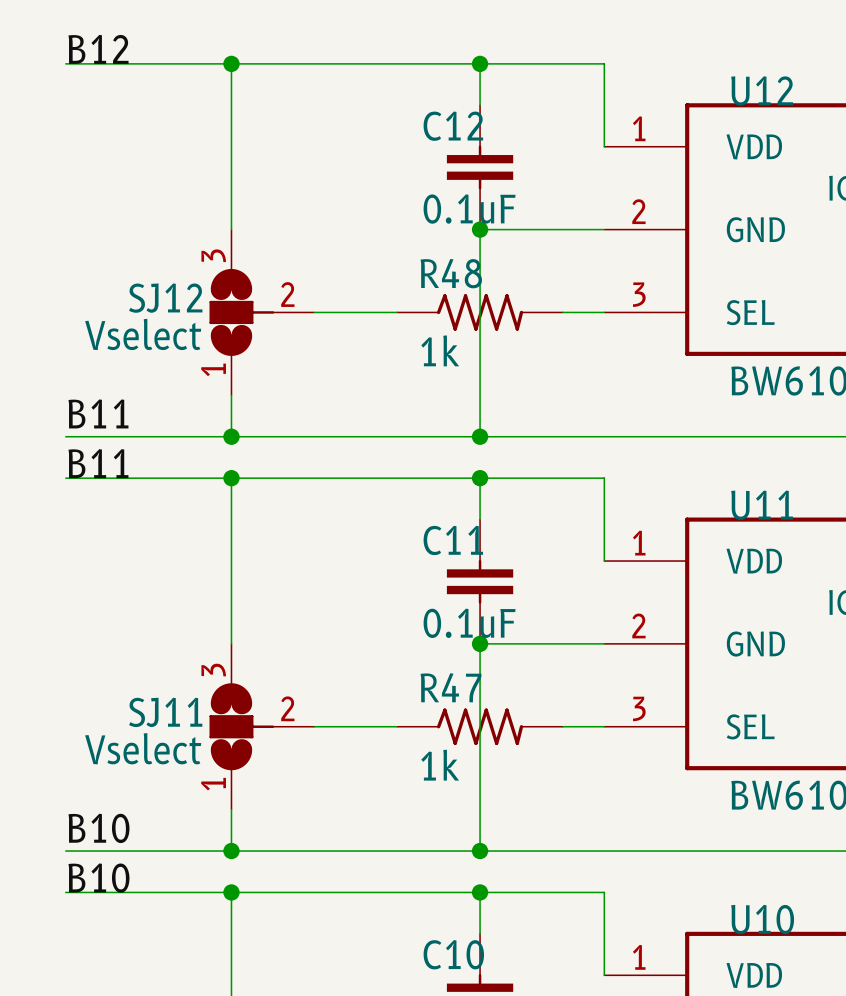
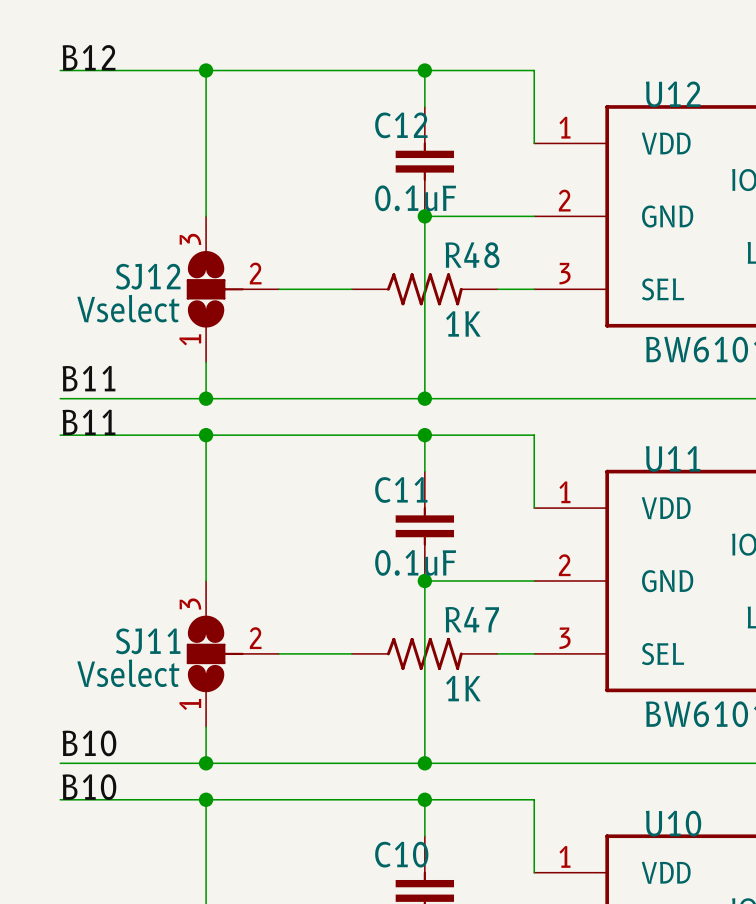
R48 name position: R48 (451, 273) -> R48 (472, 255)
R48 value: 1k (440, 350) -> 1K (463, 323)
R47 name position: R47 (451, 687) -> R47 (472, 619)
R47 value: 1k (440, 765) -> 1K (463, 688)

